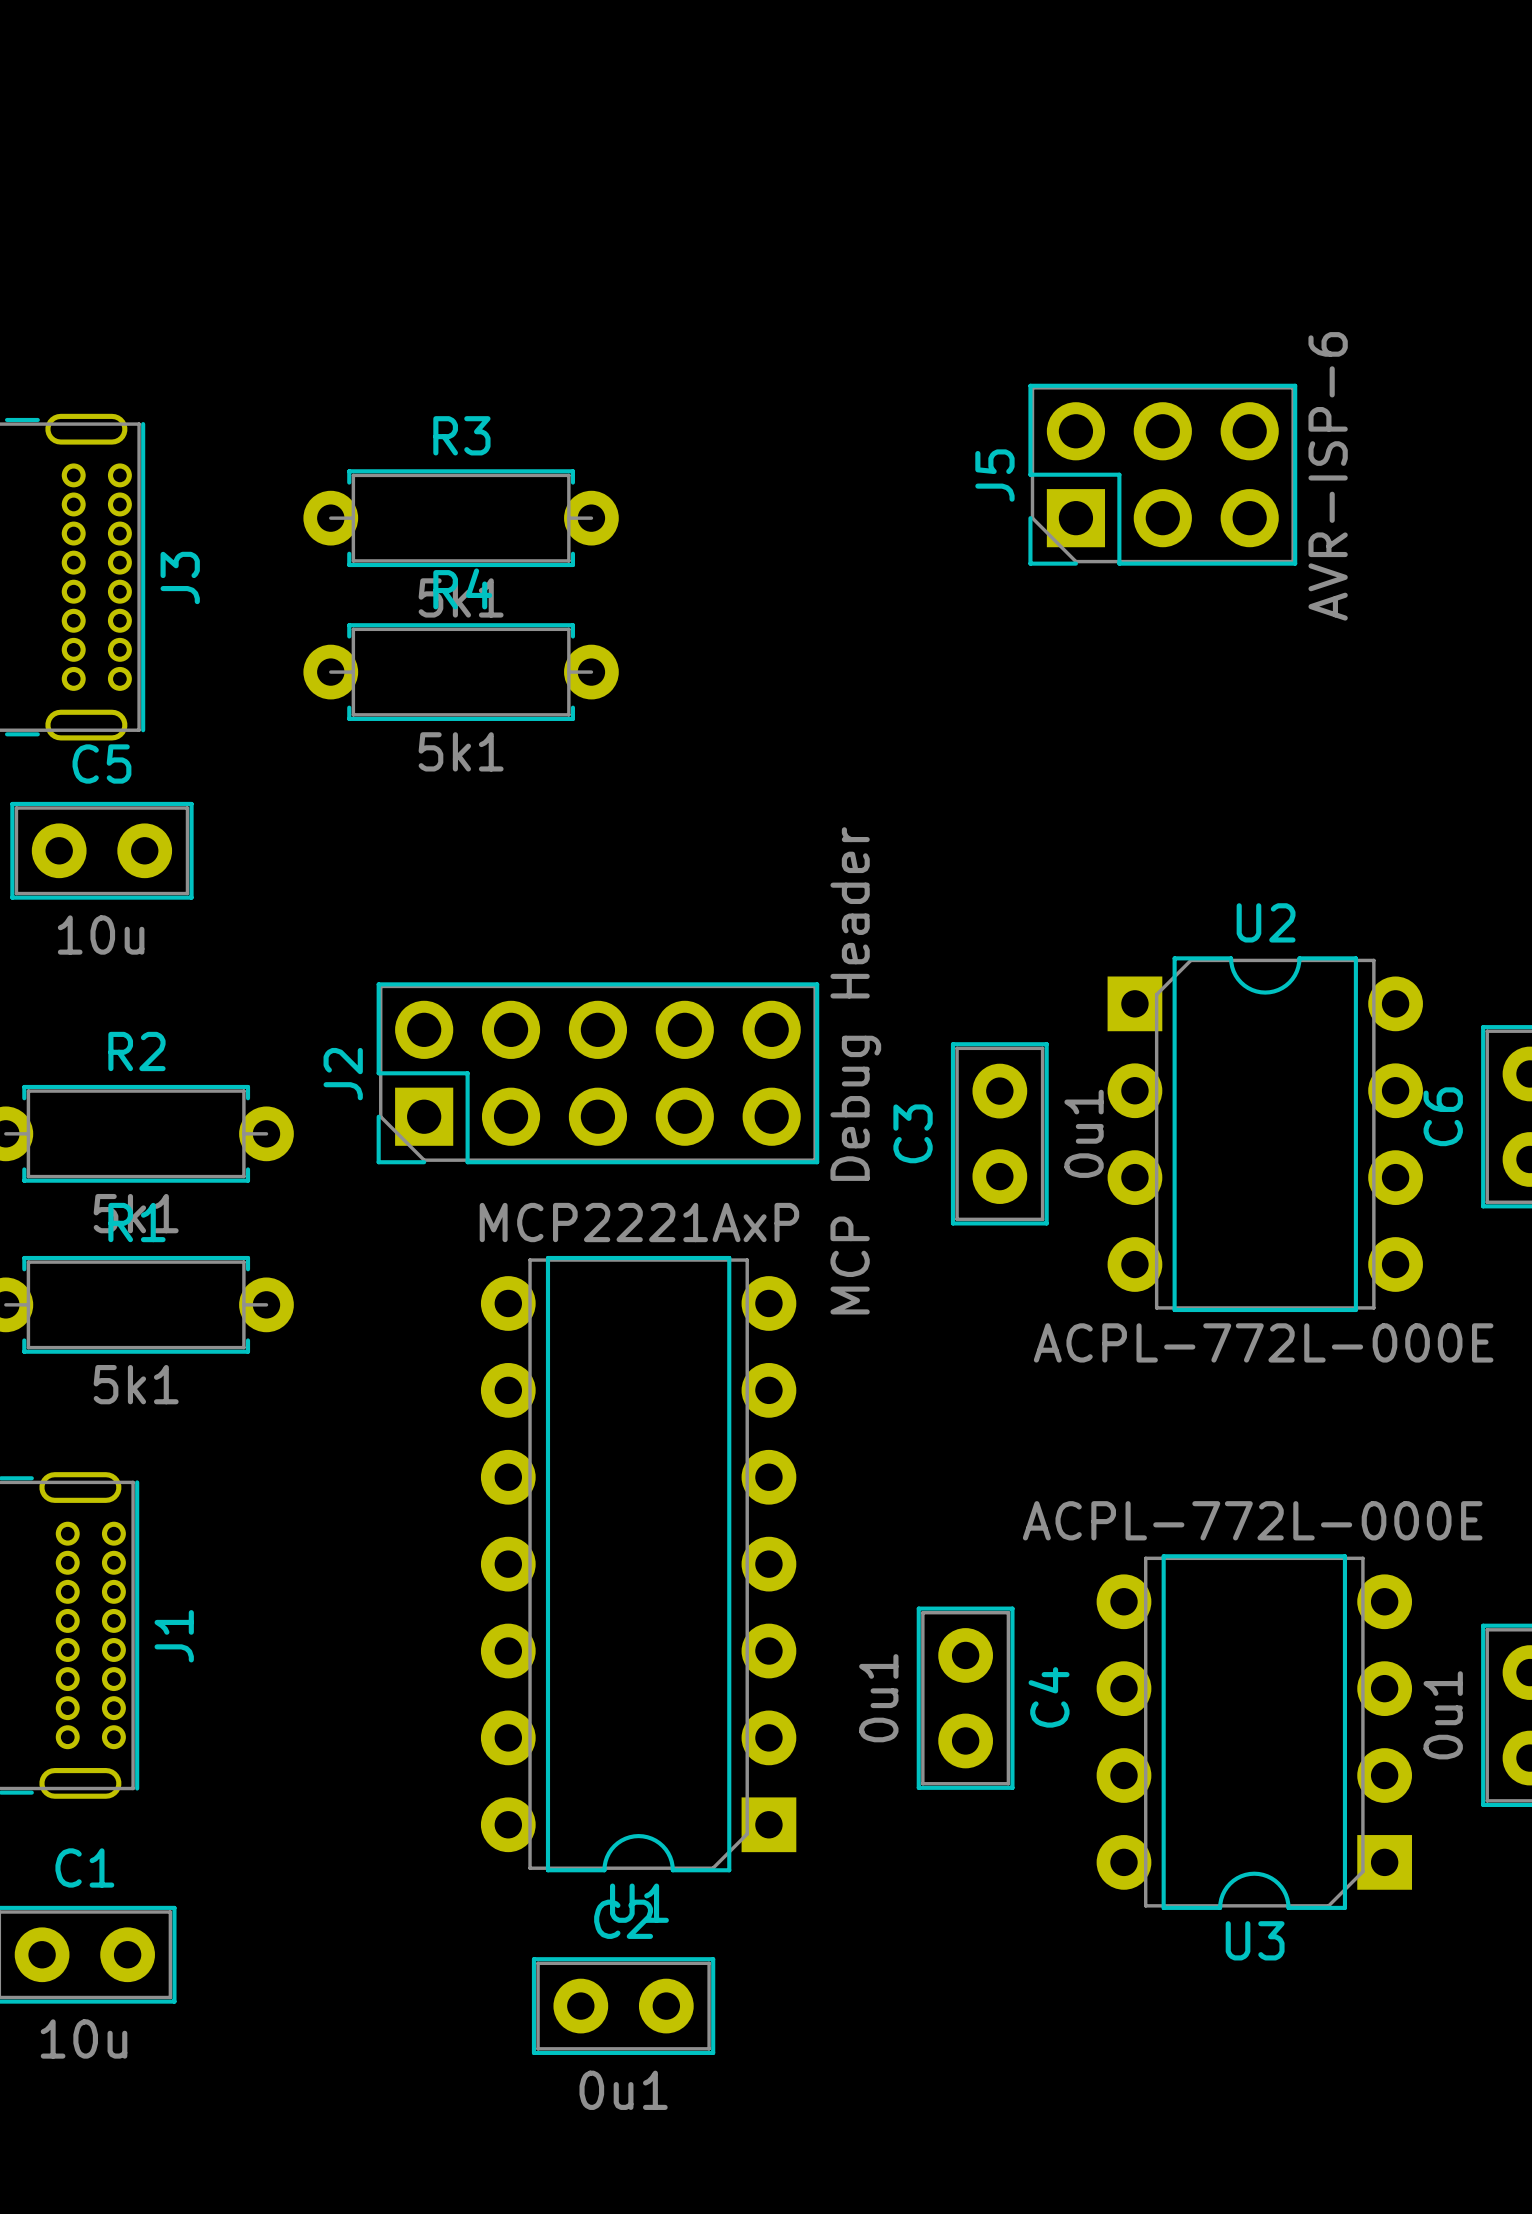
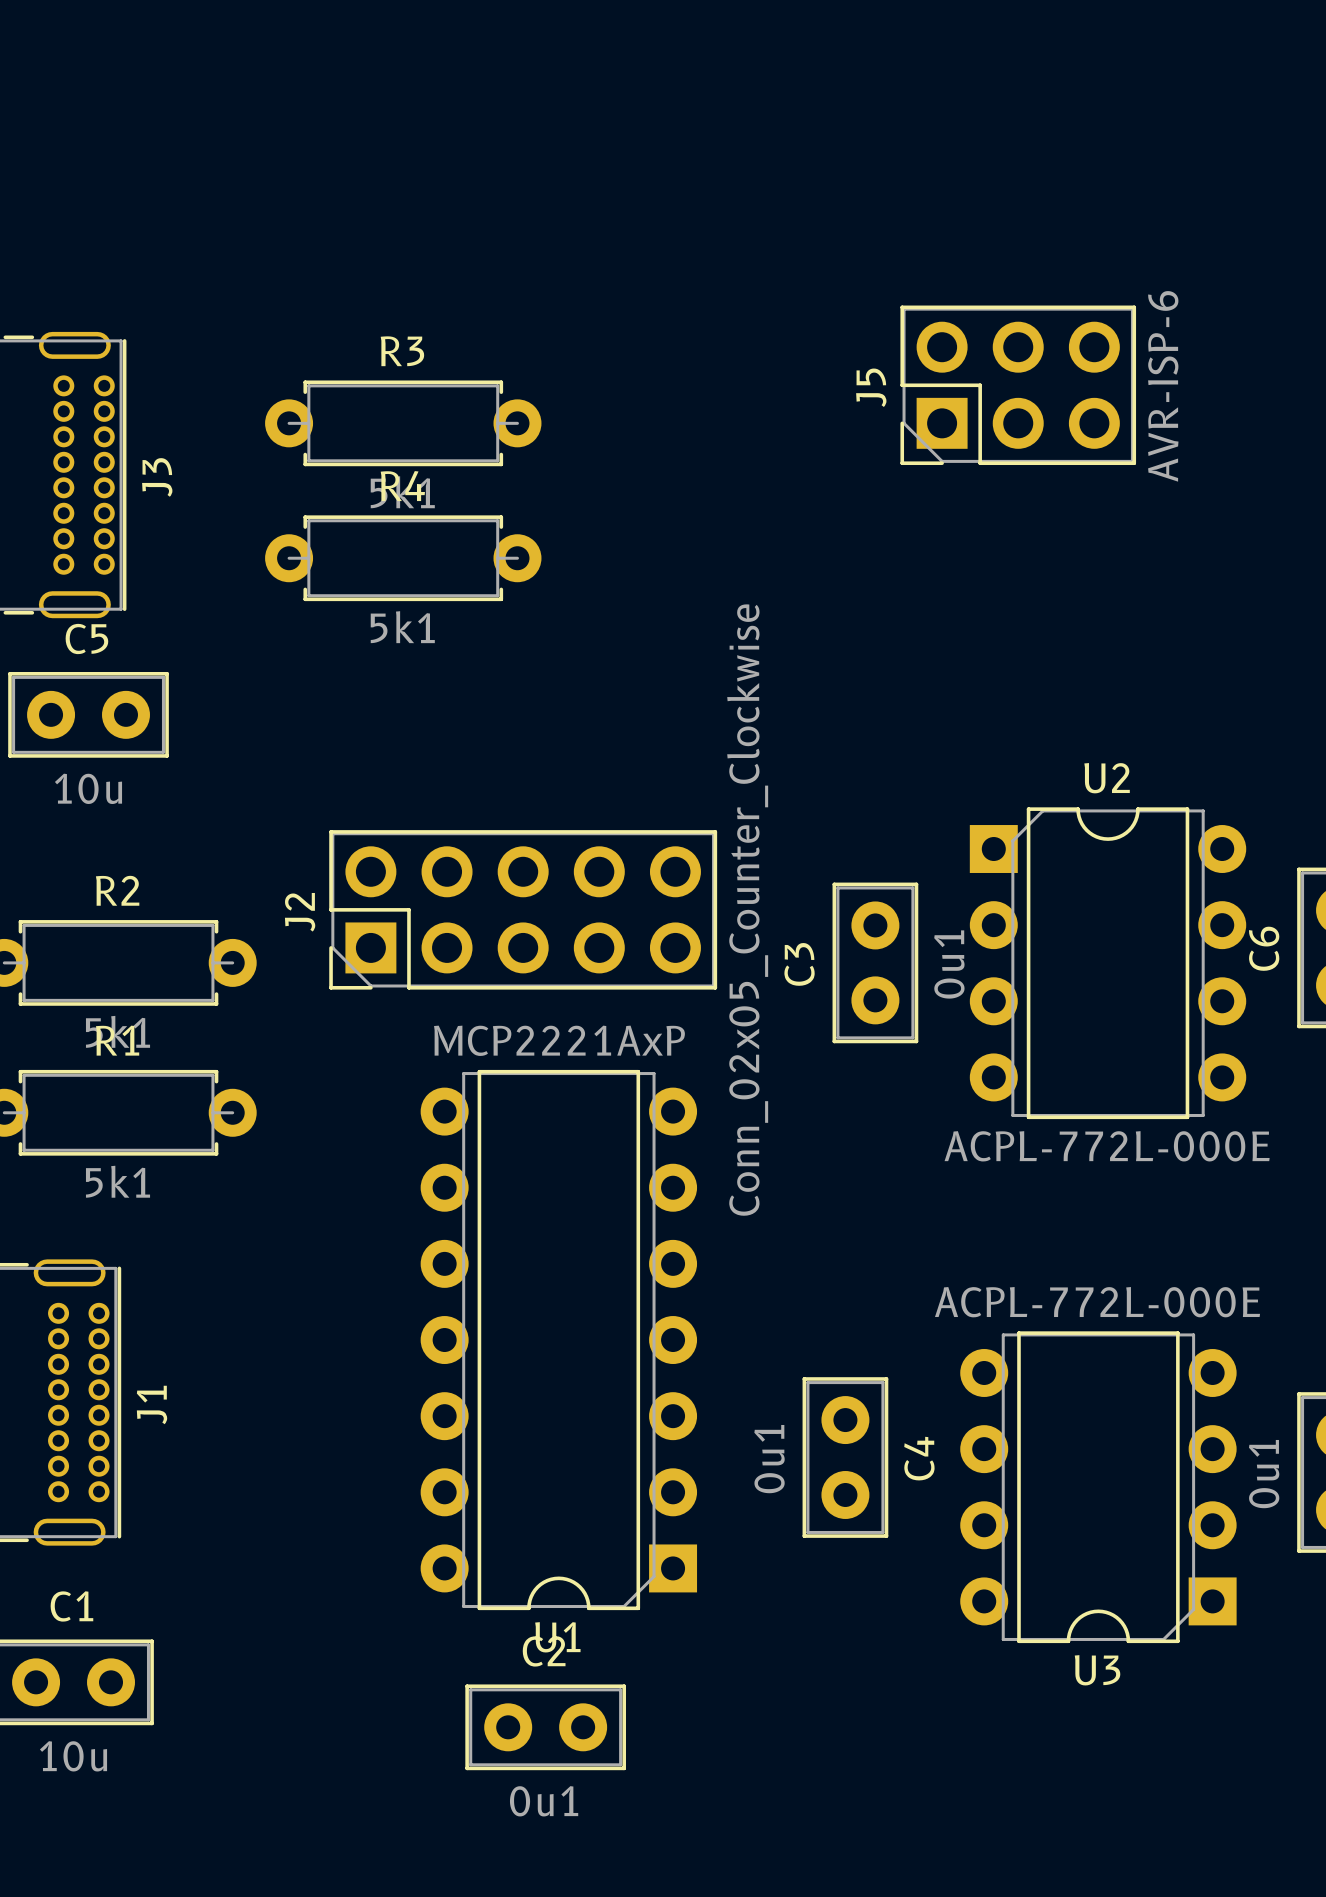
J2 value: MCP Debug Header (855, 1070) -> Conn_02x05_Counter_Clockwise (747, 910)

